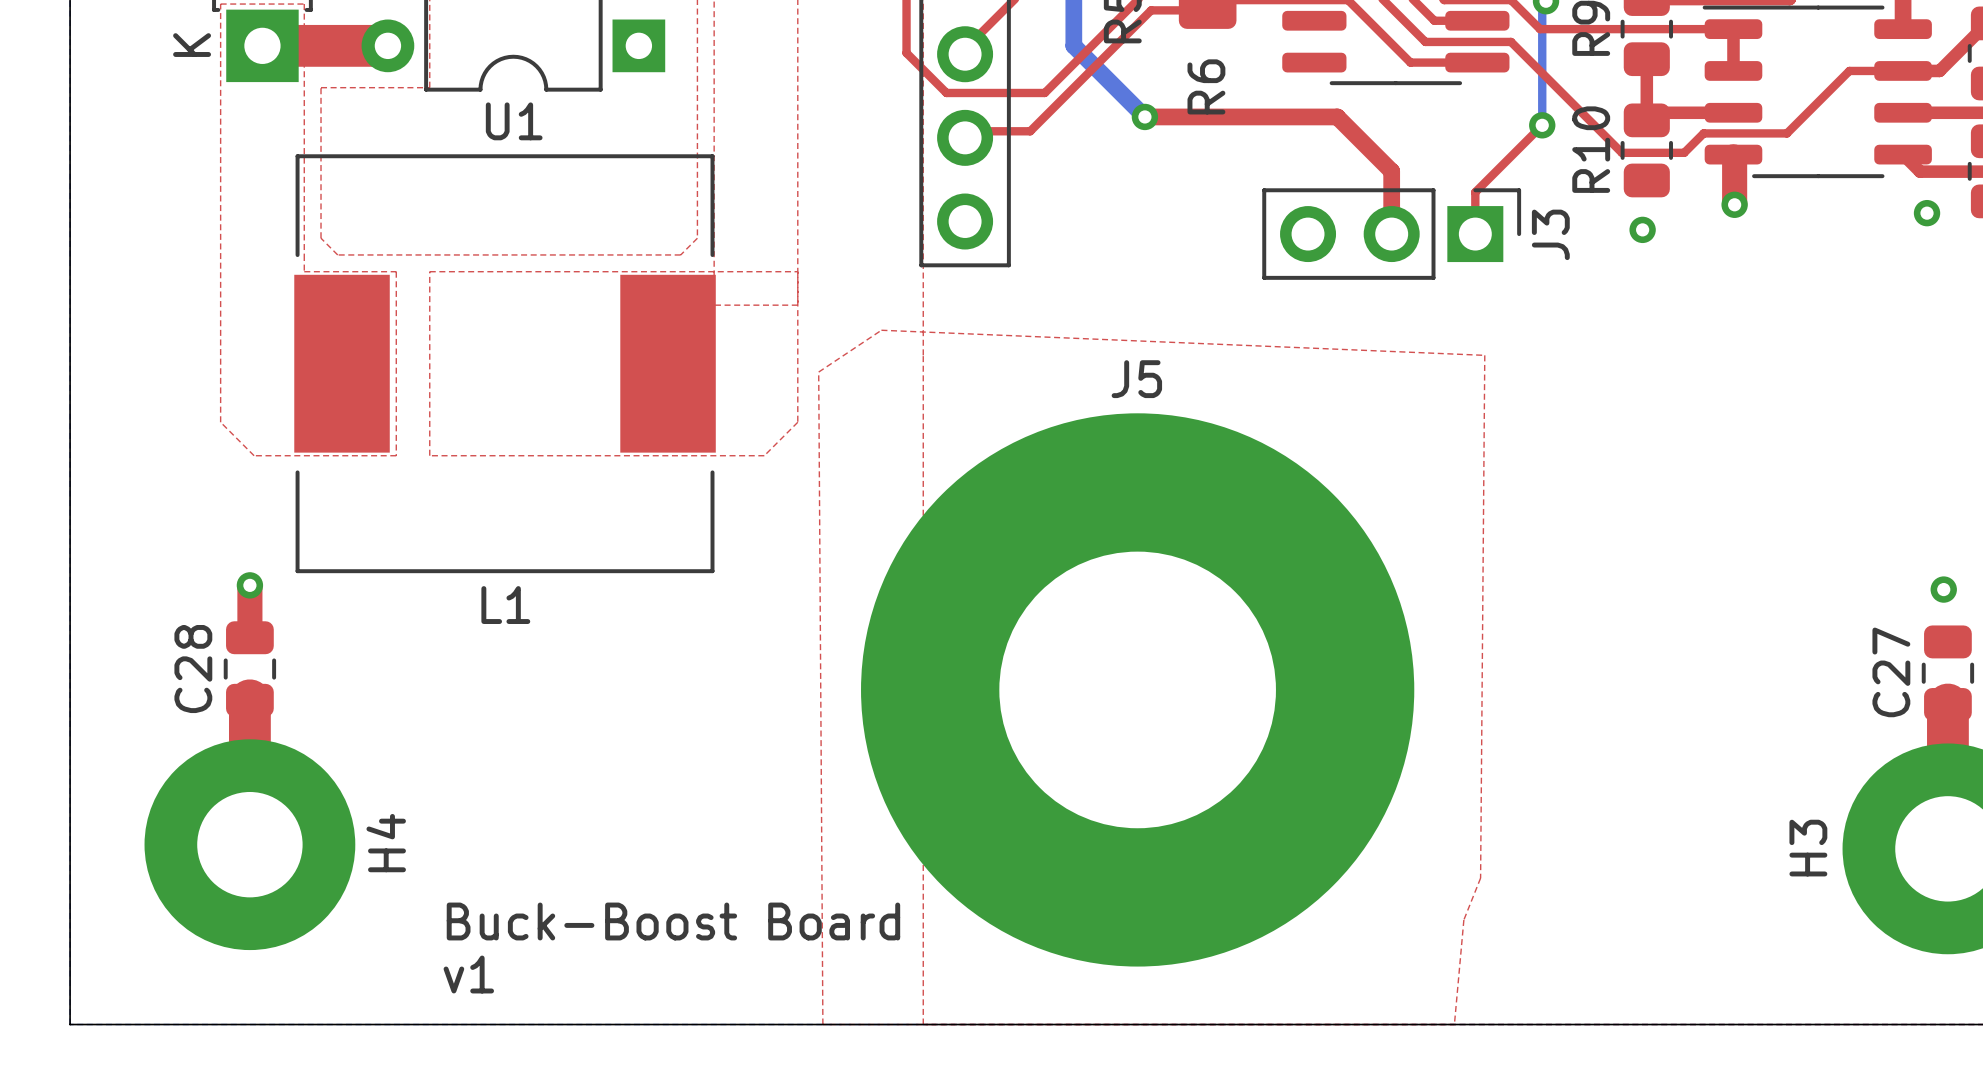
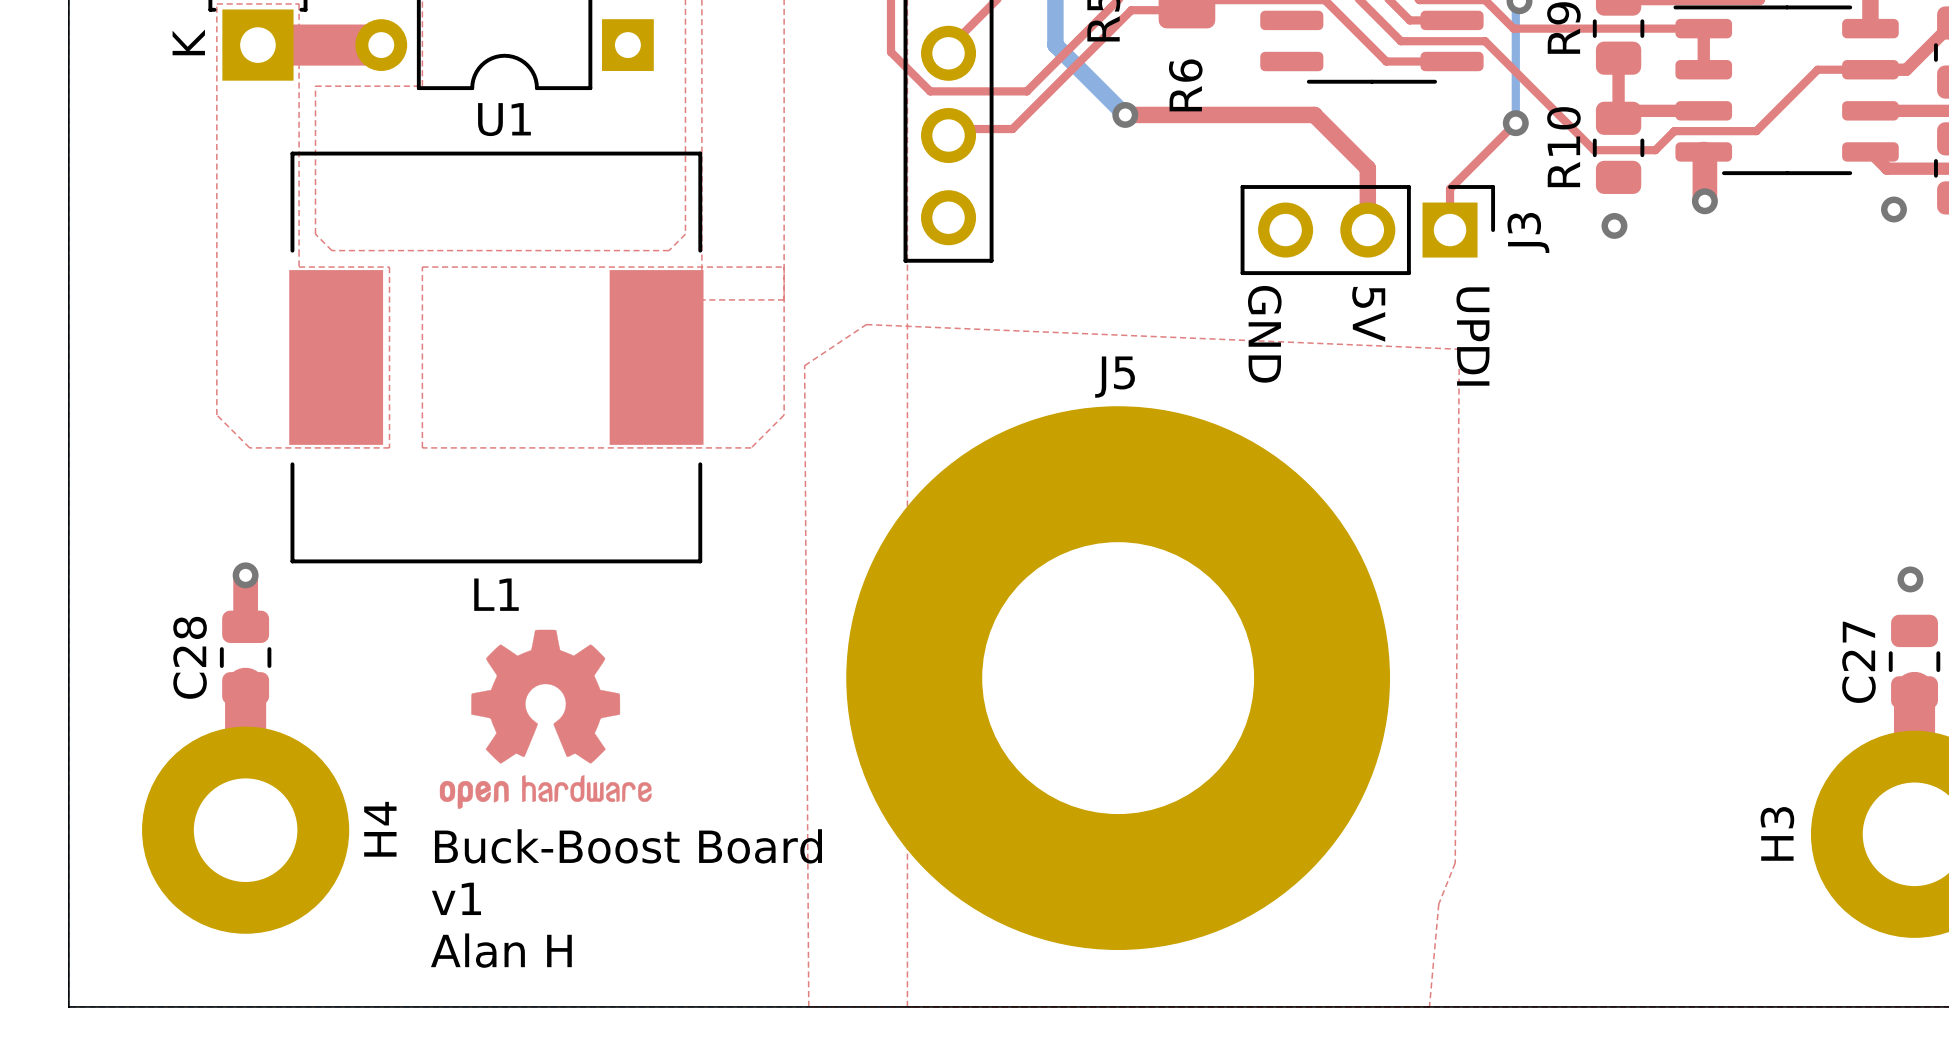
text: none -> 5V (1368, 314)
text: none -> GND (1264, 334)
text: none -> UPDI (1472, 336)
drawing: none -> [439, 629, 652, 810]
text: none -> Buck-Boost Board (628, 846)
text: Buck-Boost Board (673, 921) -> v1 (456, 898)
text: v1 (468, 974) -> Alan H (501, 950)

